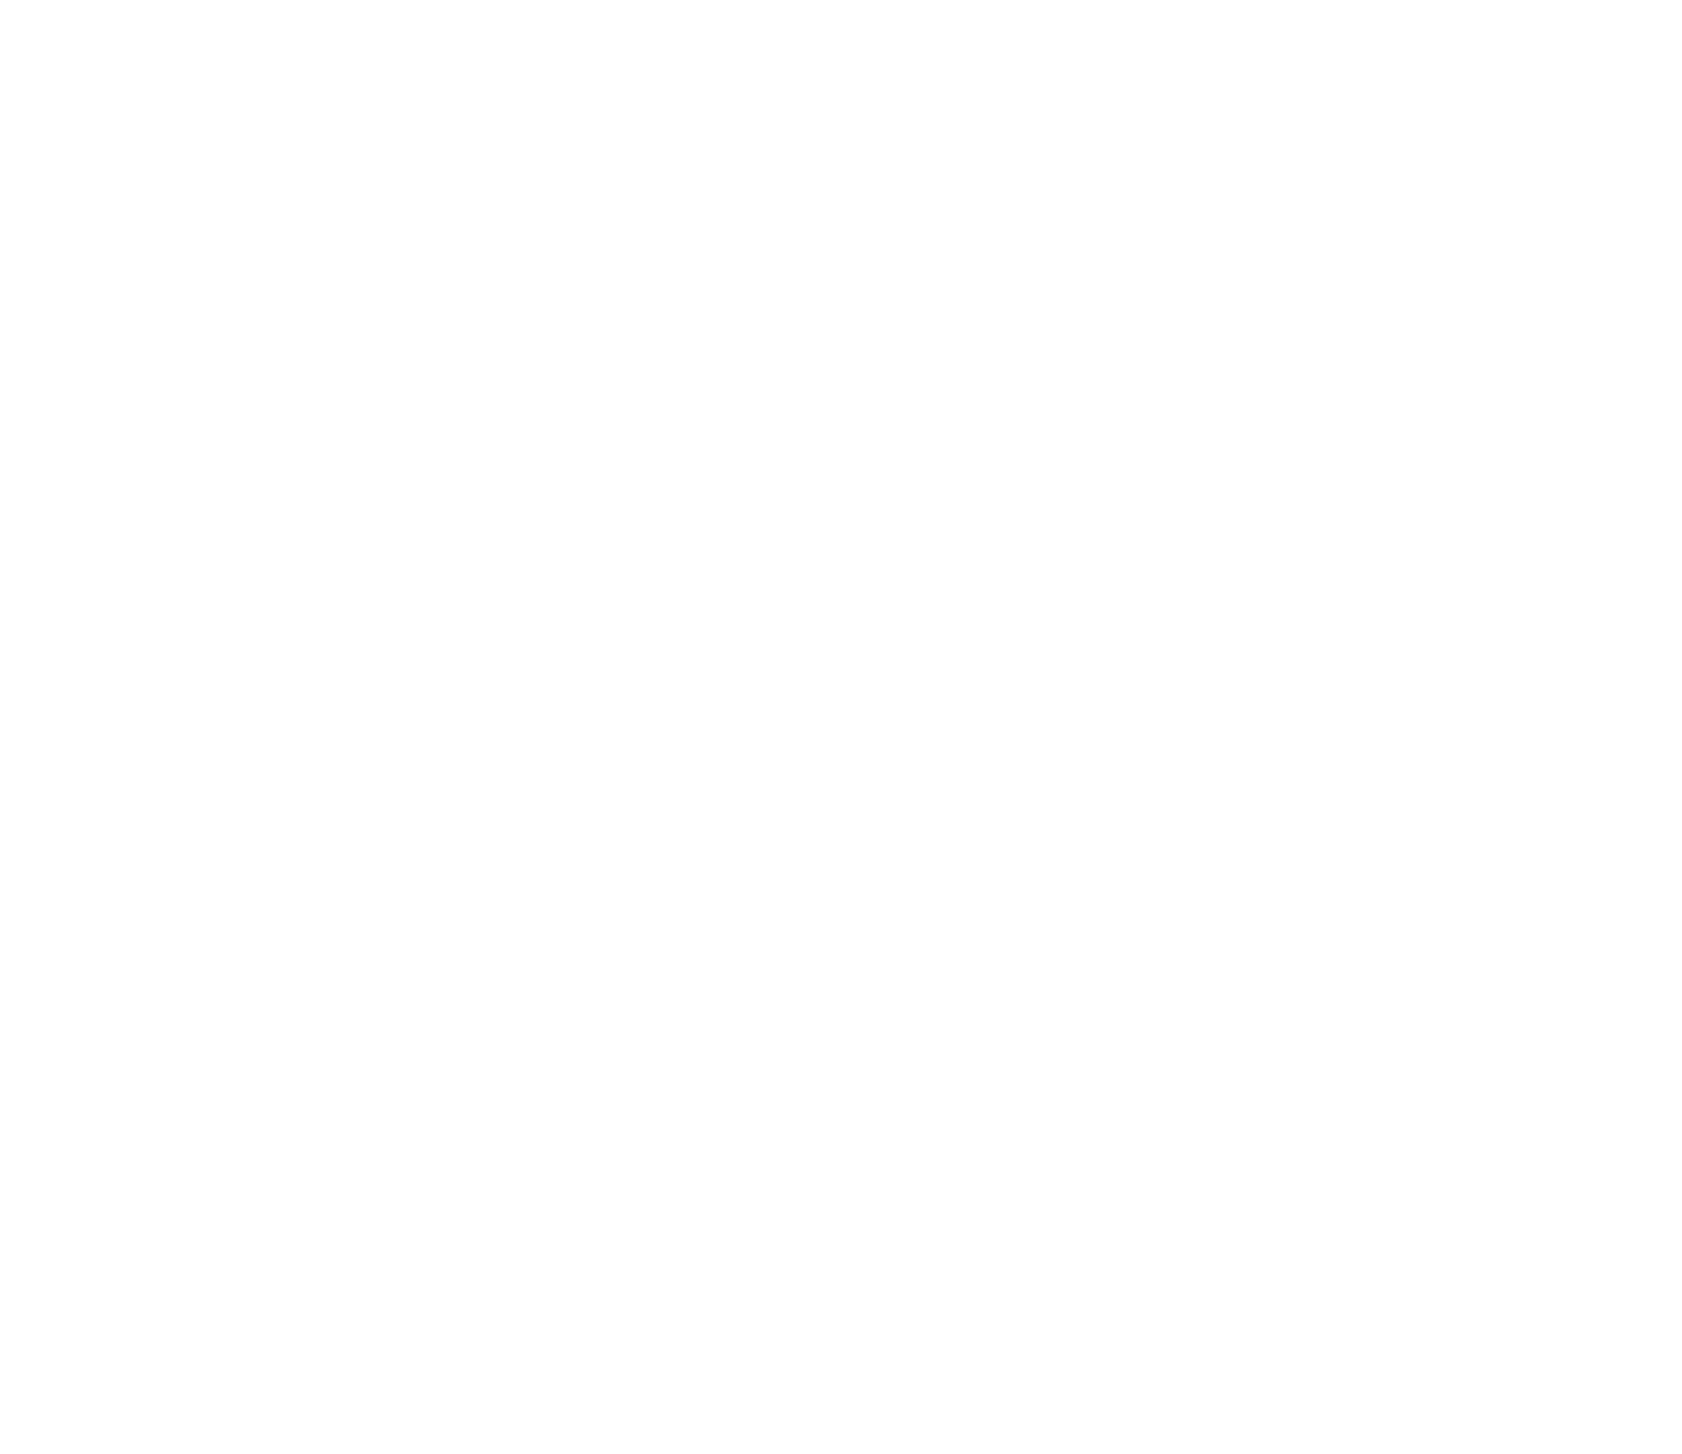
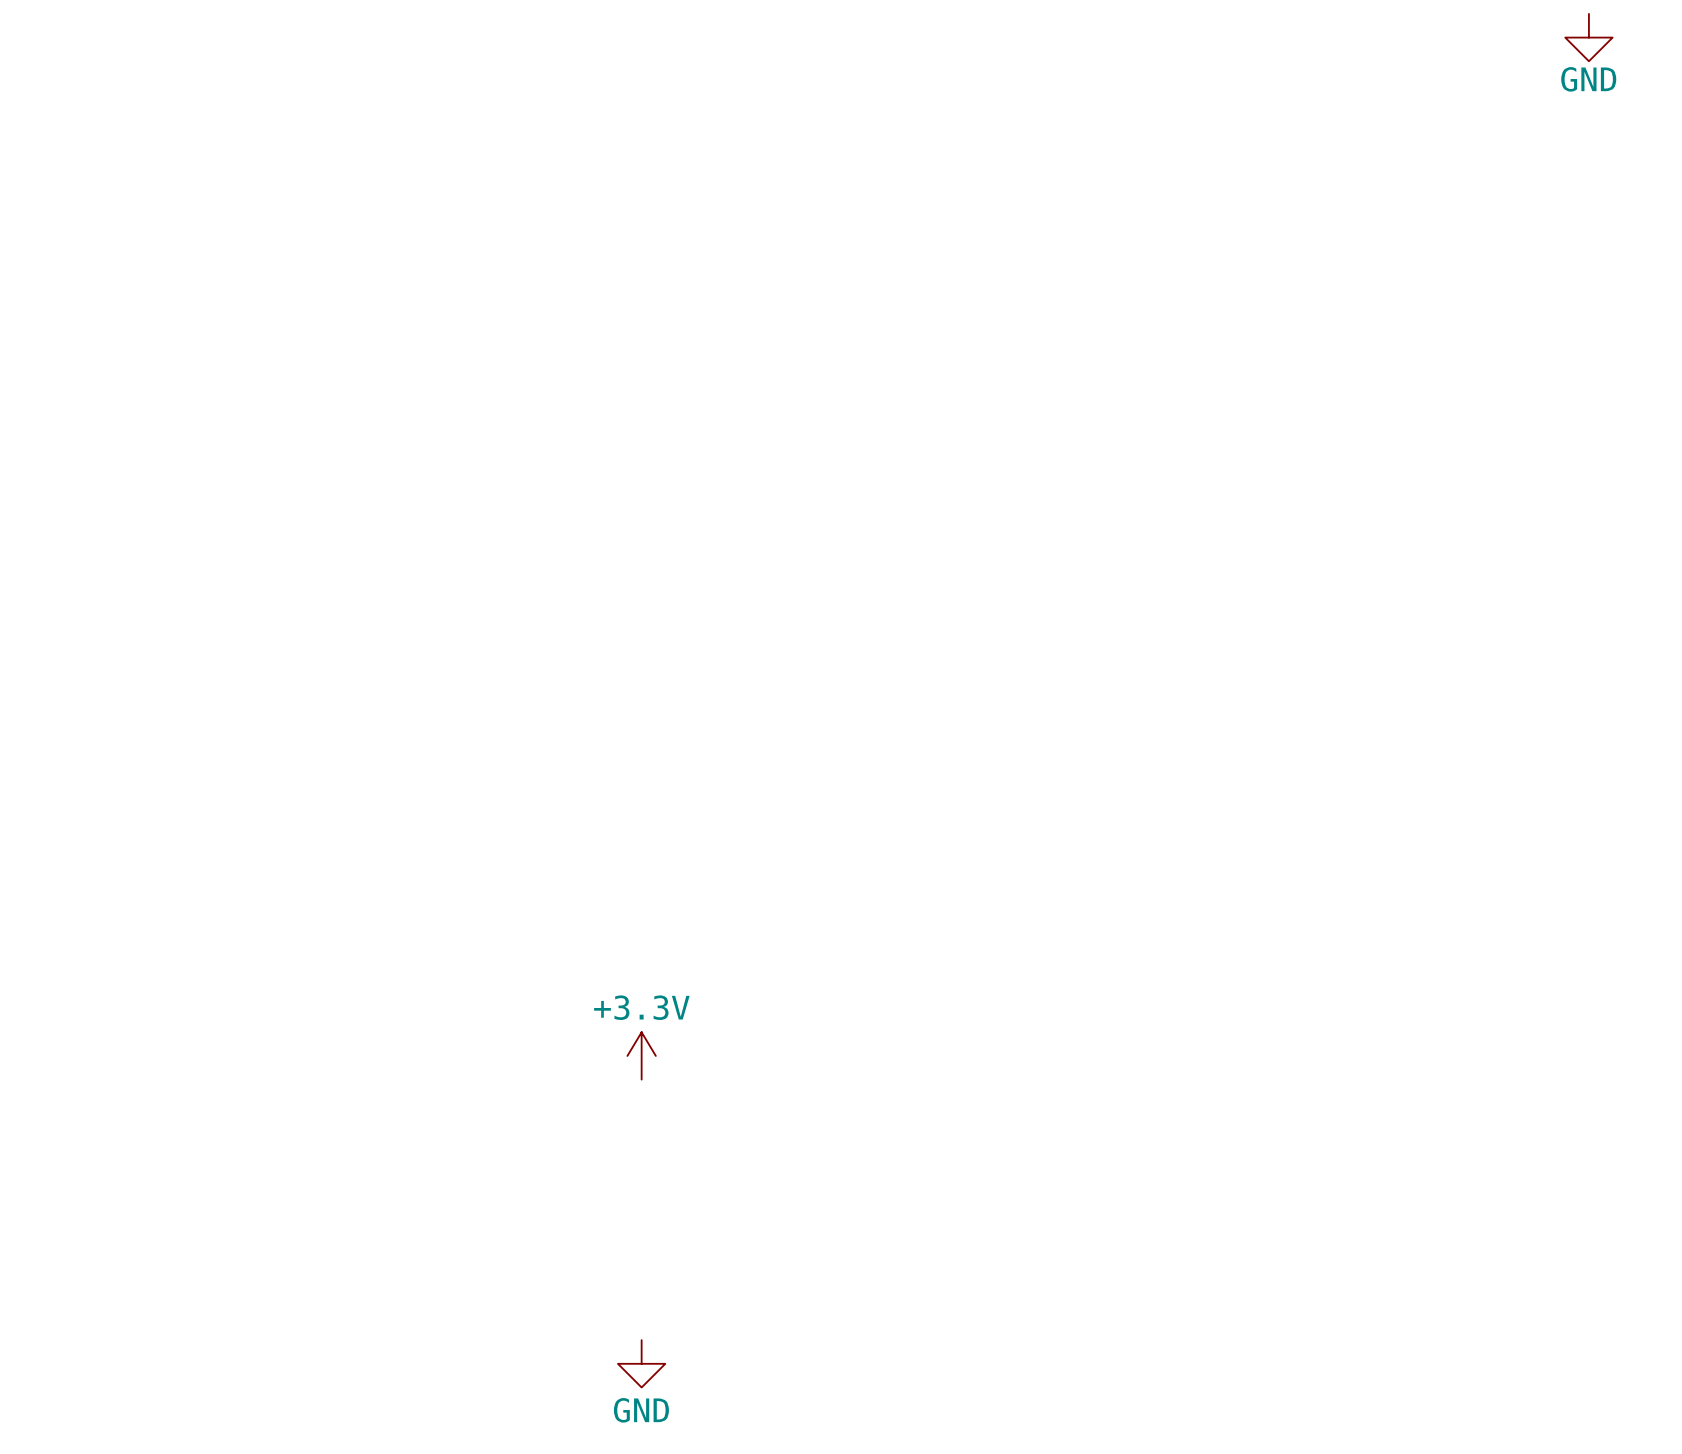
power symbol: none -> GND (1588, 37)
power symbol: none -> +3.3V (641, 1055)
power symbol: none -> GND (641, 1363)

